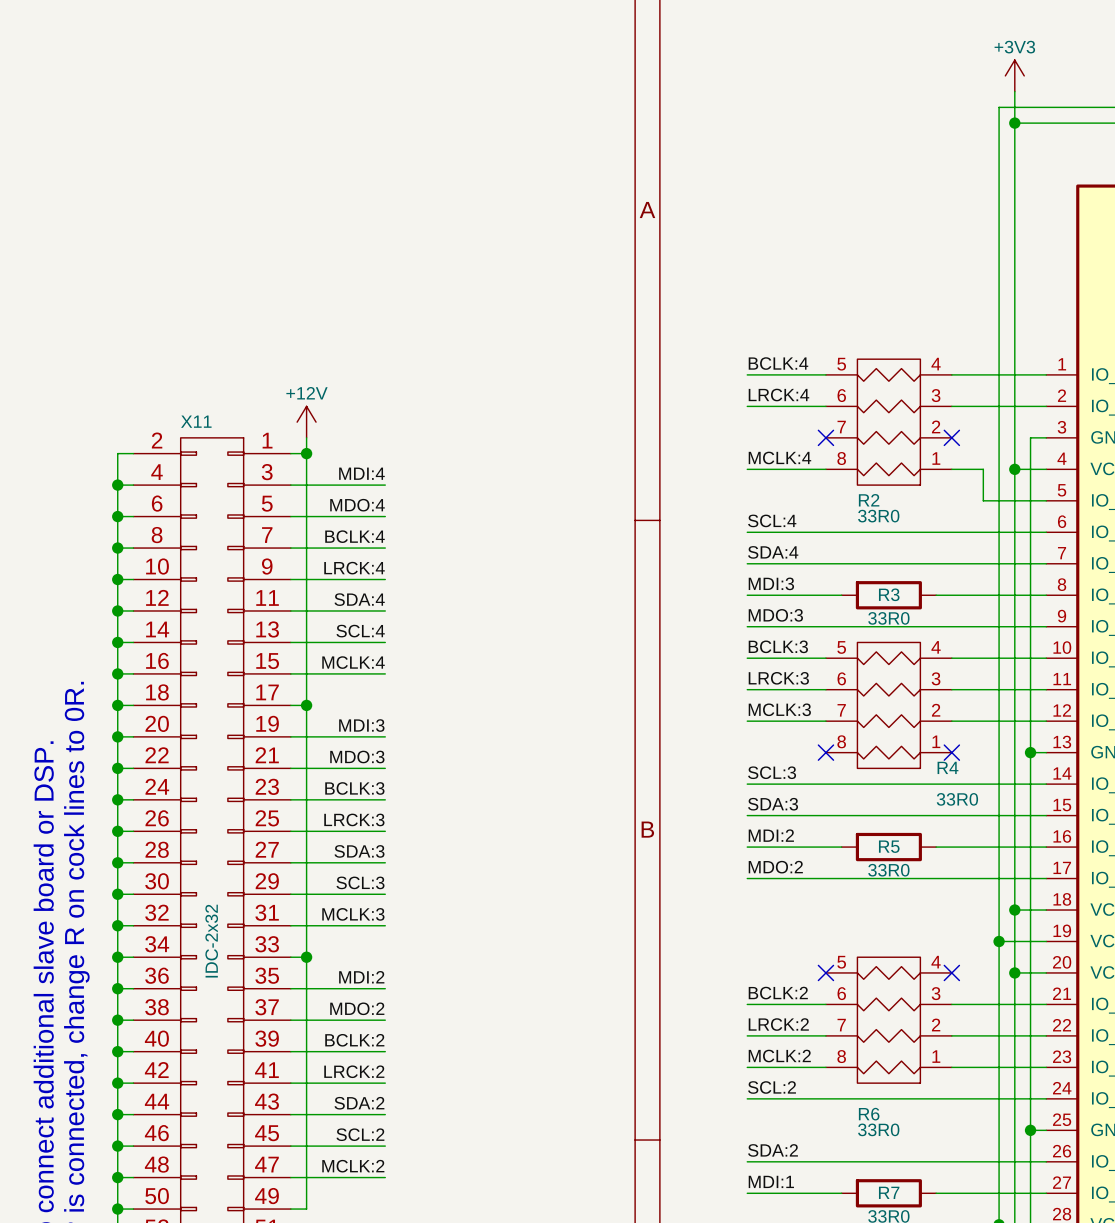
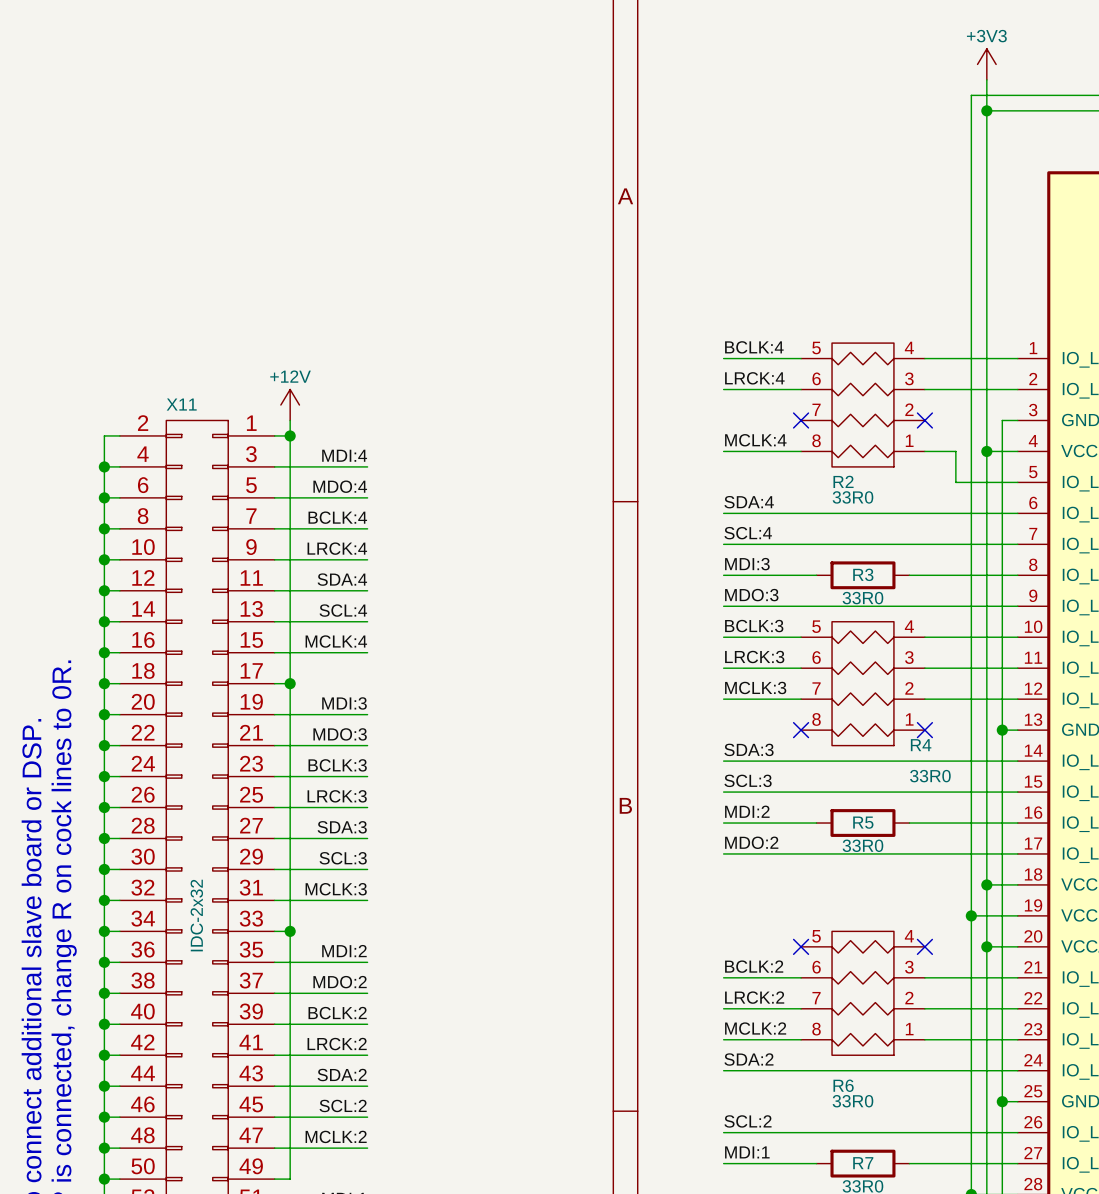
label: SCL:4 (772, 520) -> SDA:4 (749, 502)
label: SDA:4 (773, 552) -> SCL:4 (748, 533)
label: SCL:3 (772, 772) -> SDA:3 (749, 749)
label: SDA:3 (773, 804) -> SCL:3 (748, 780)
label: SCL:2 (772, 1087) -> SDA:2 (748, 1059)
label: SDA:2 (773, 1150) -> SCL:2 (748, 1121)

